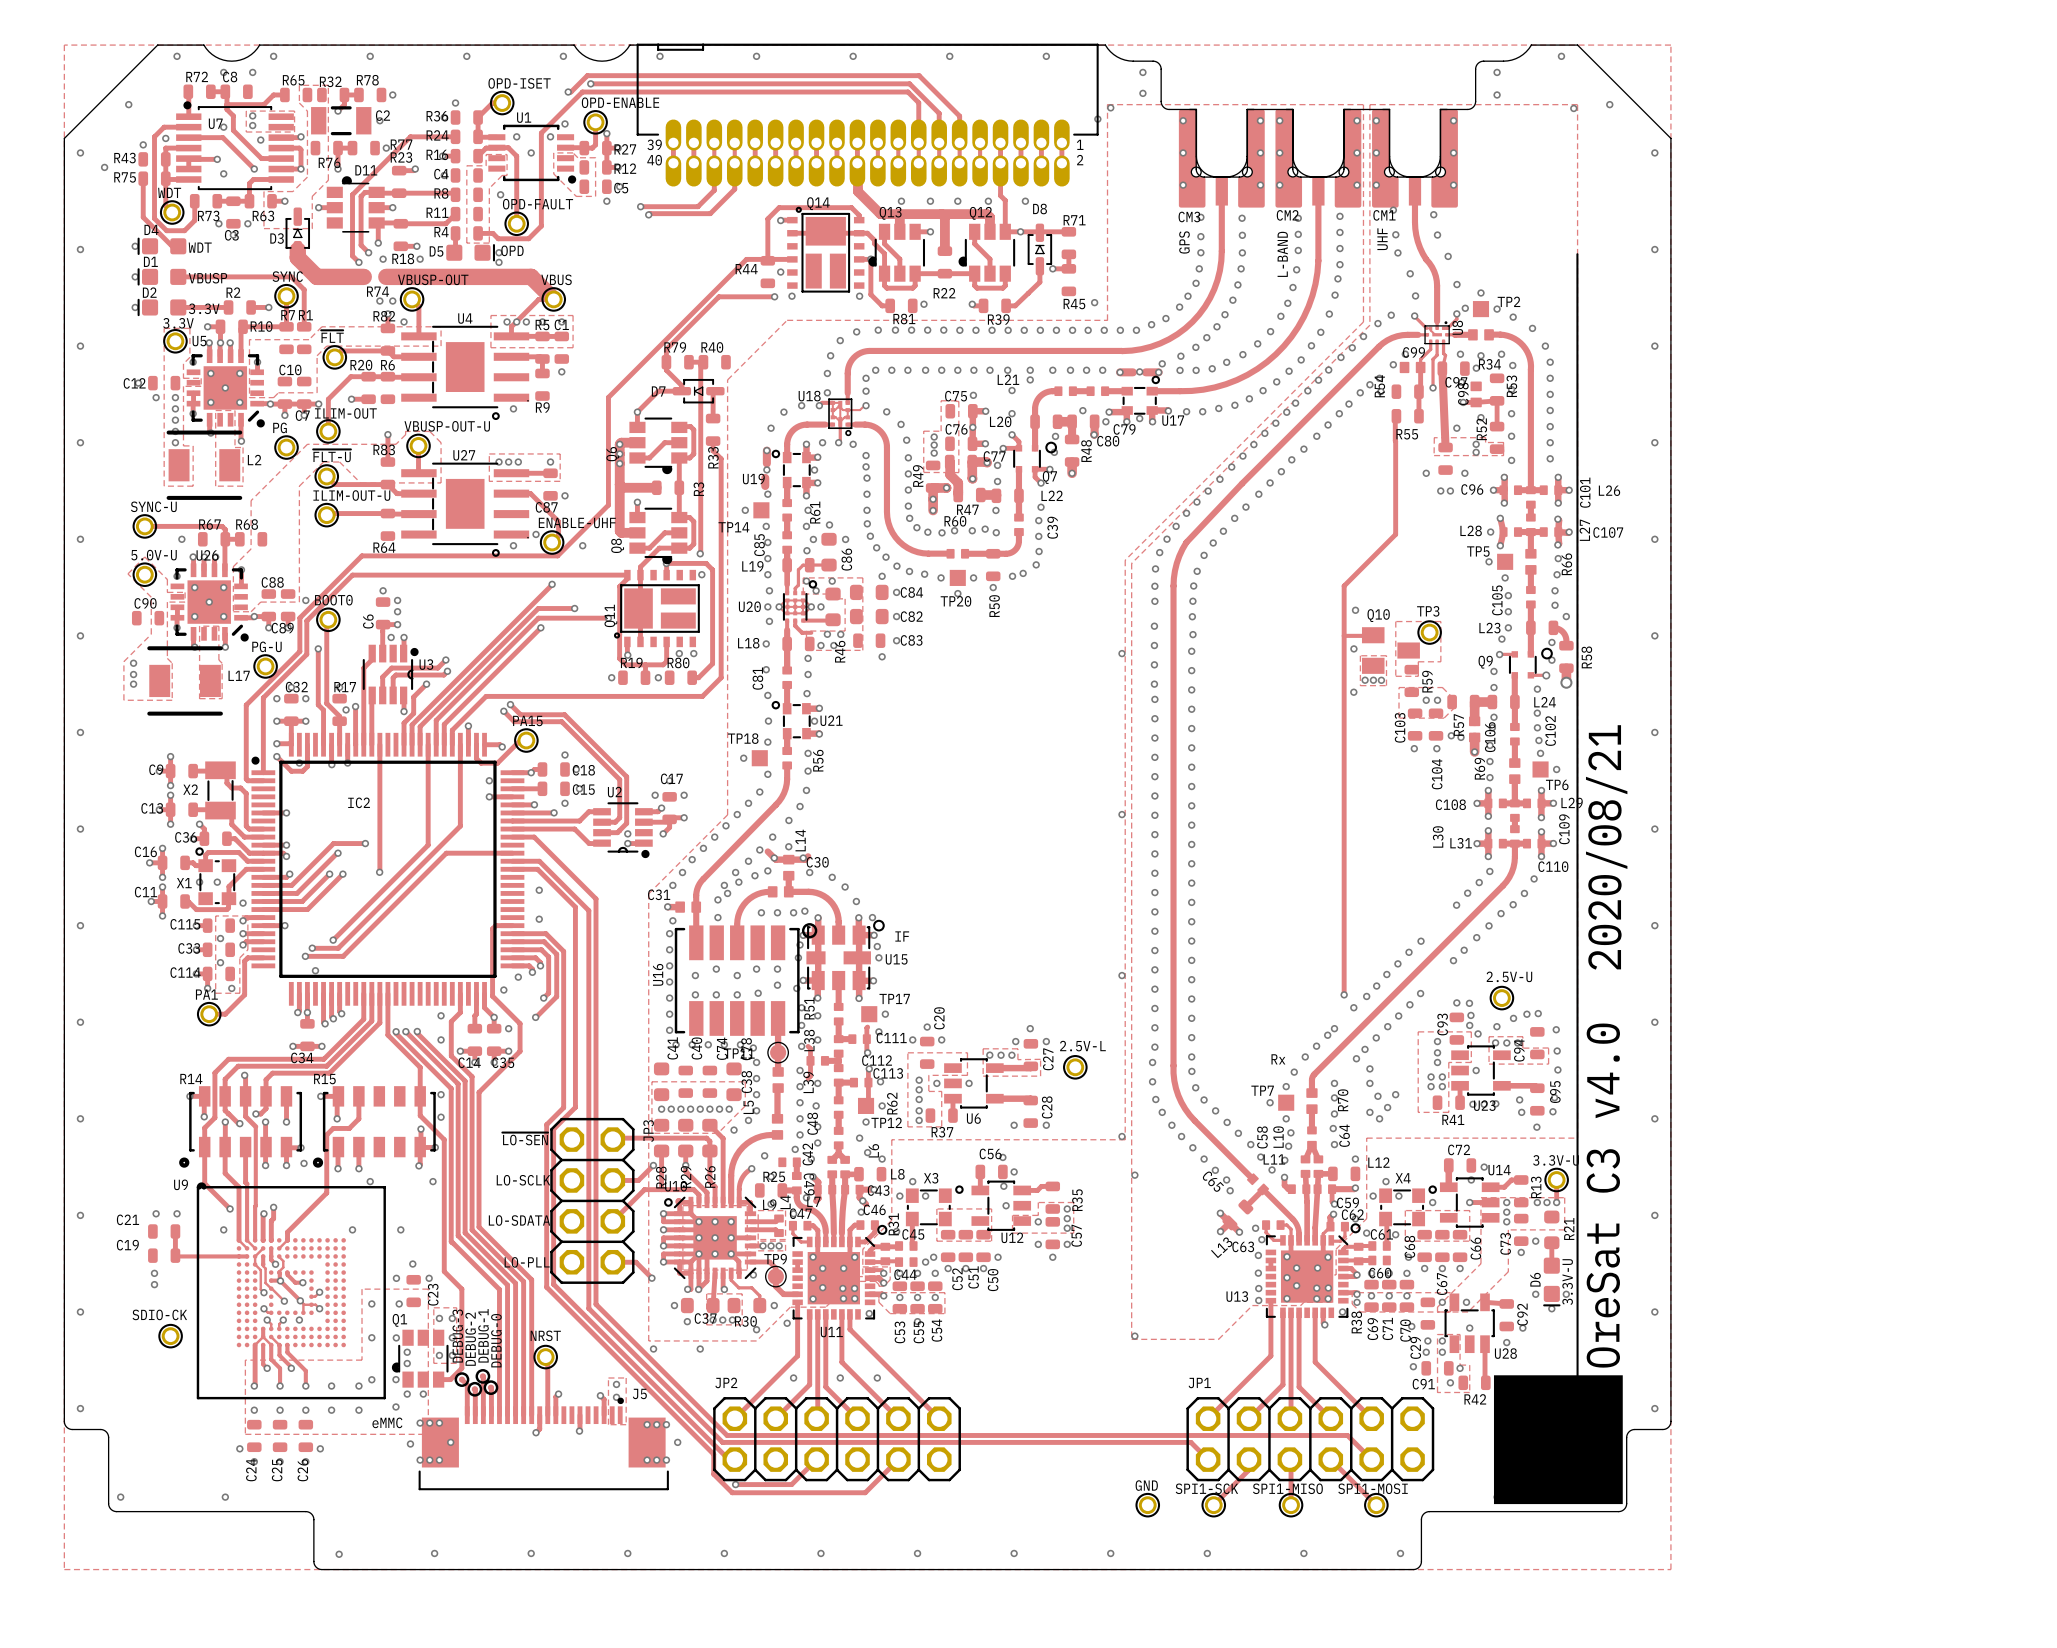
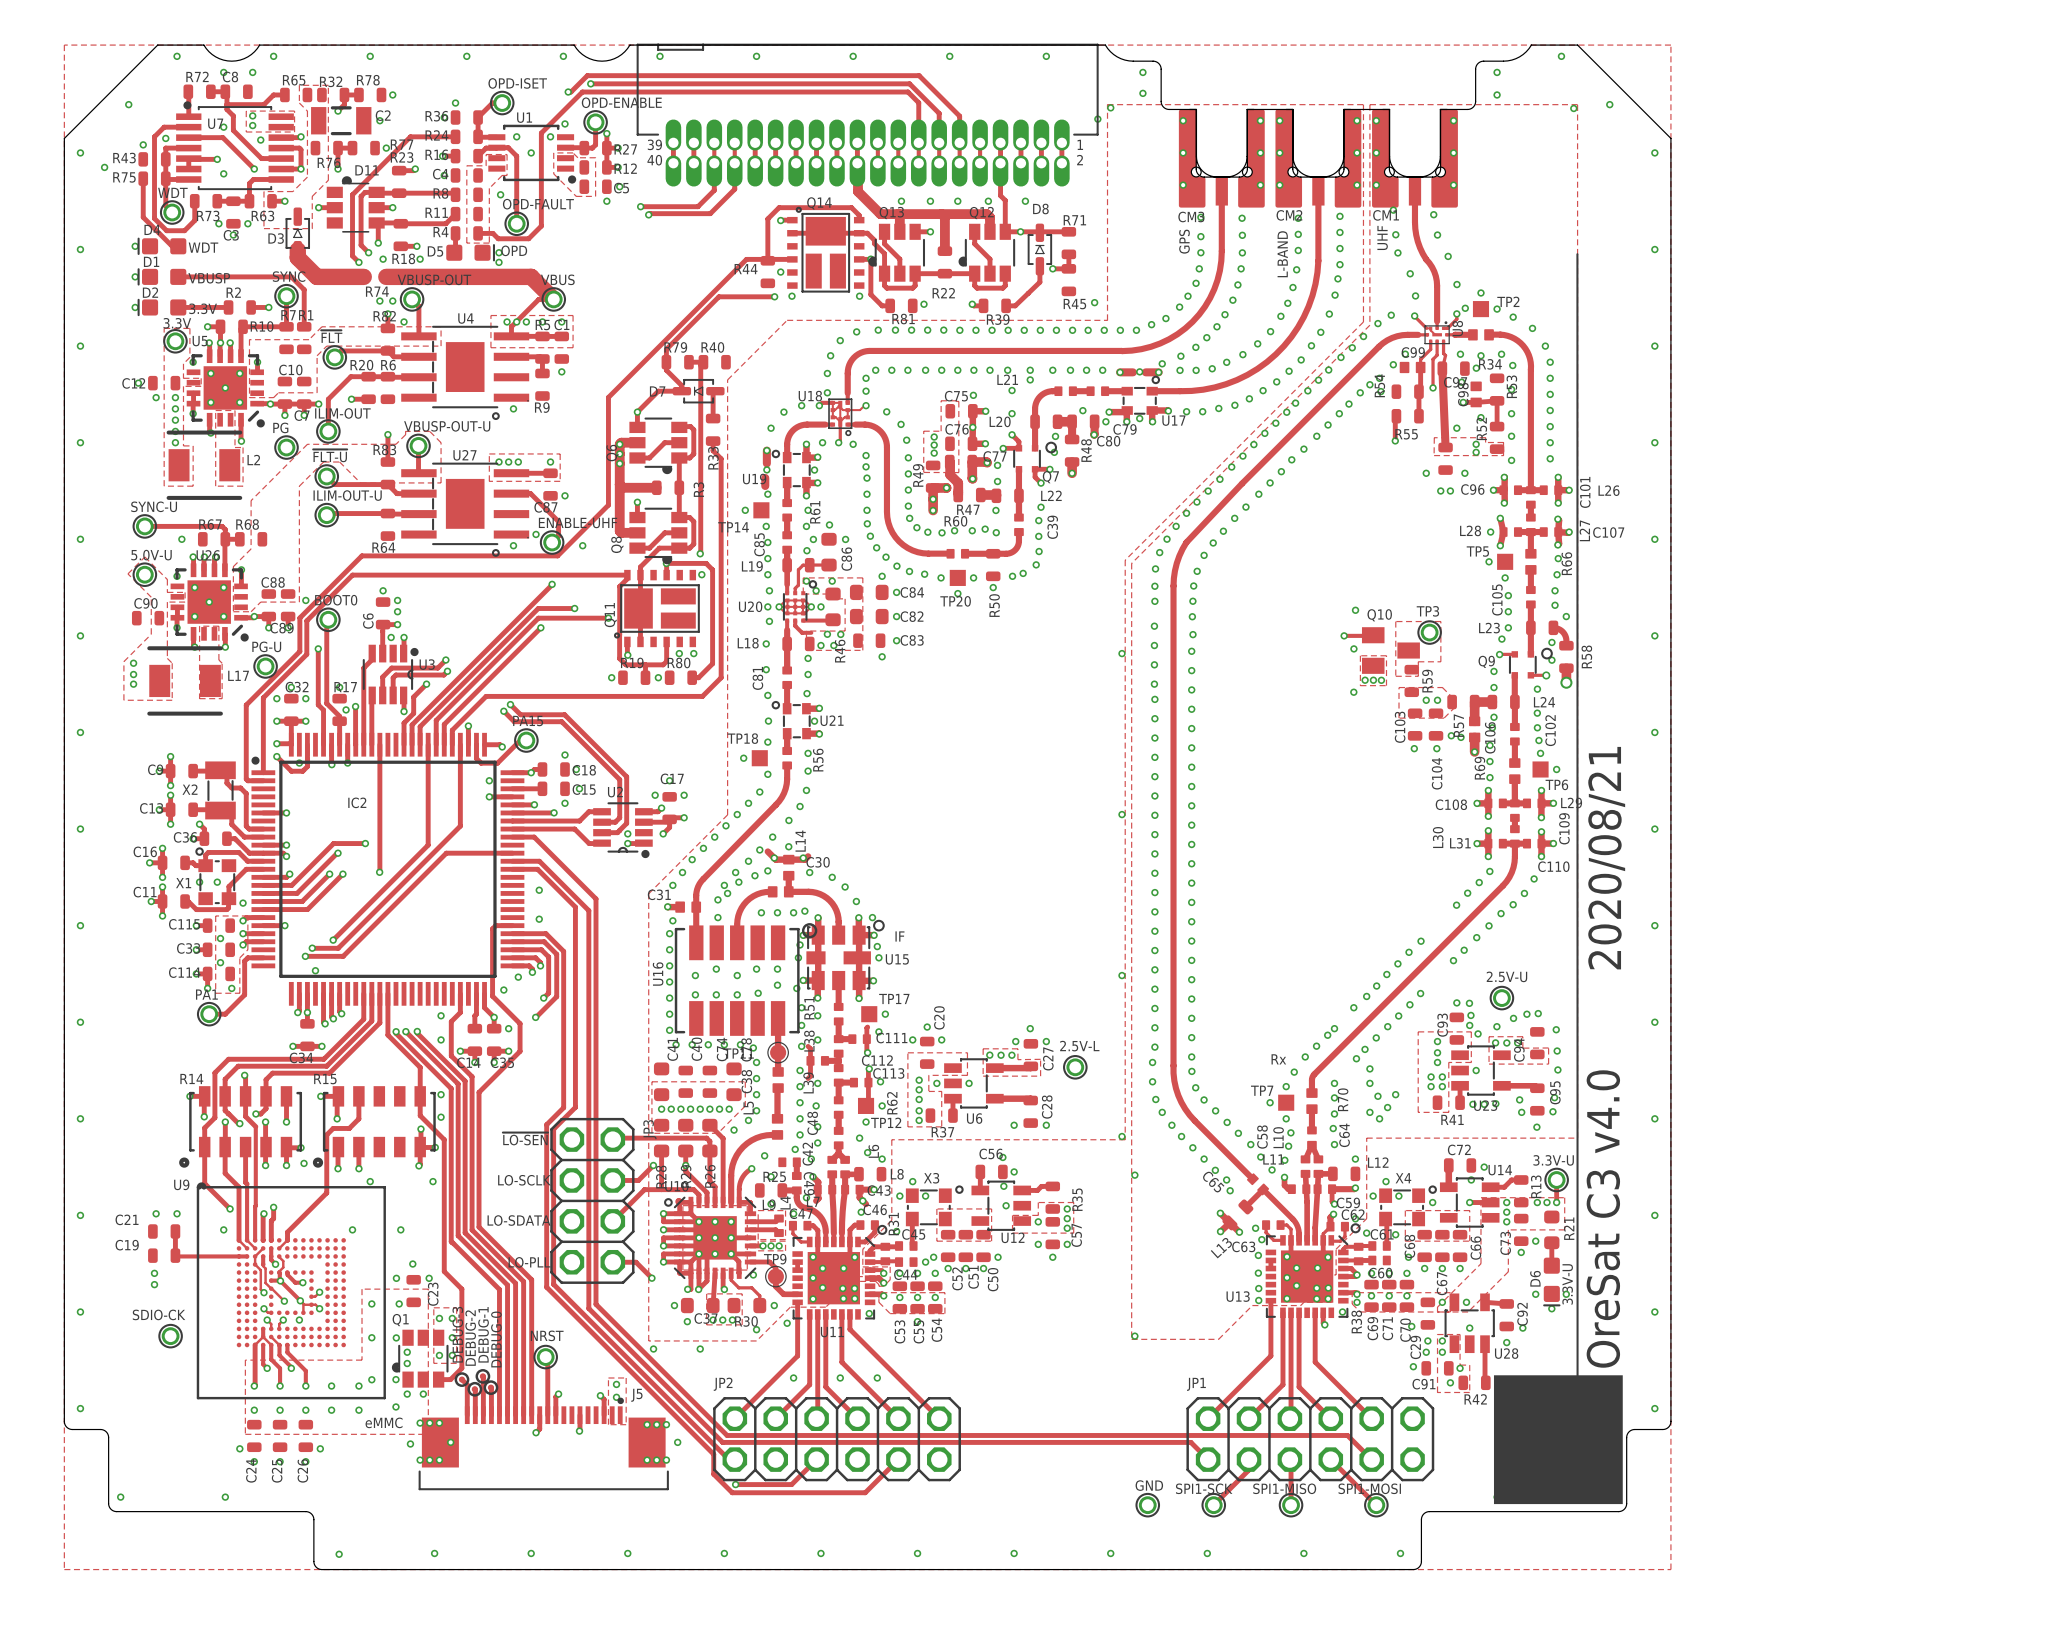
track: (1395, 440) (1395, 534) (1344, 585) (1344, 994) -> none
via: none -> (1395, 440)
via: none -> (1344, 635)
via: (1344, 994) -> none

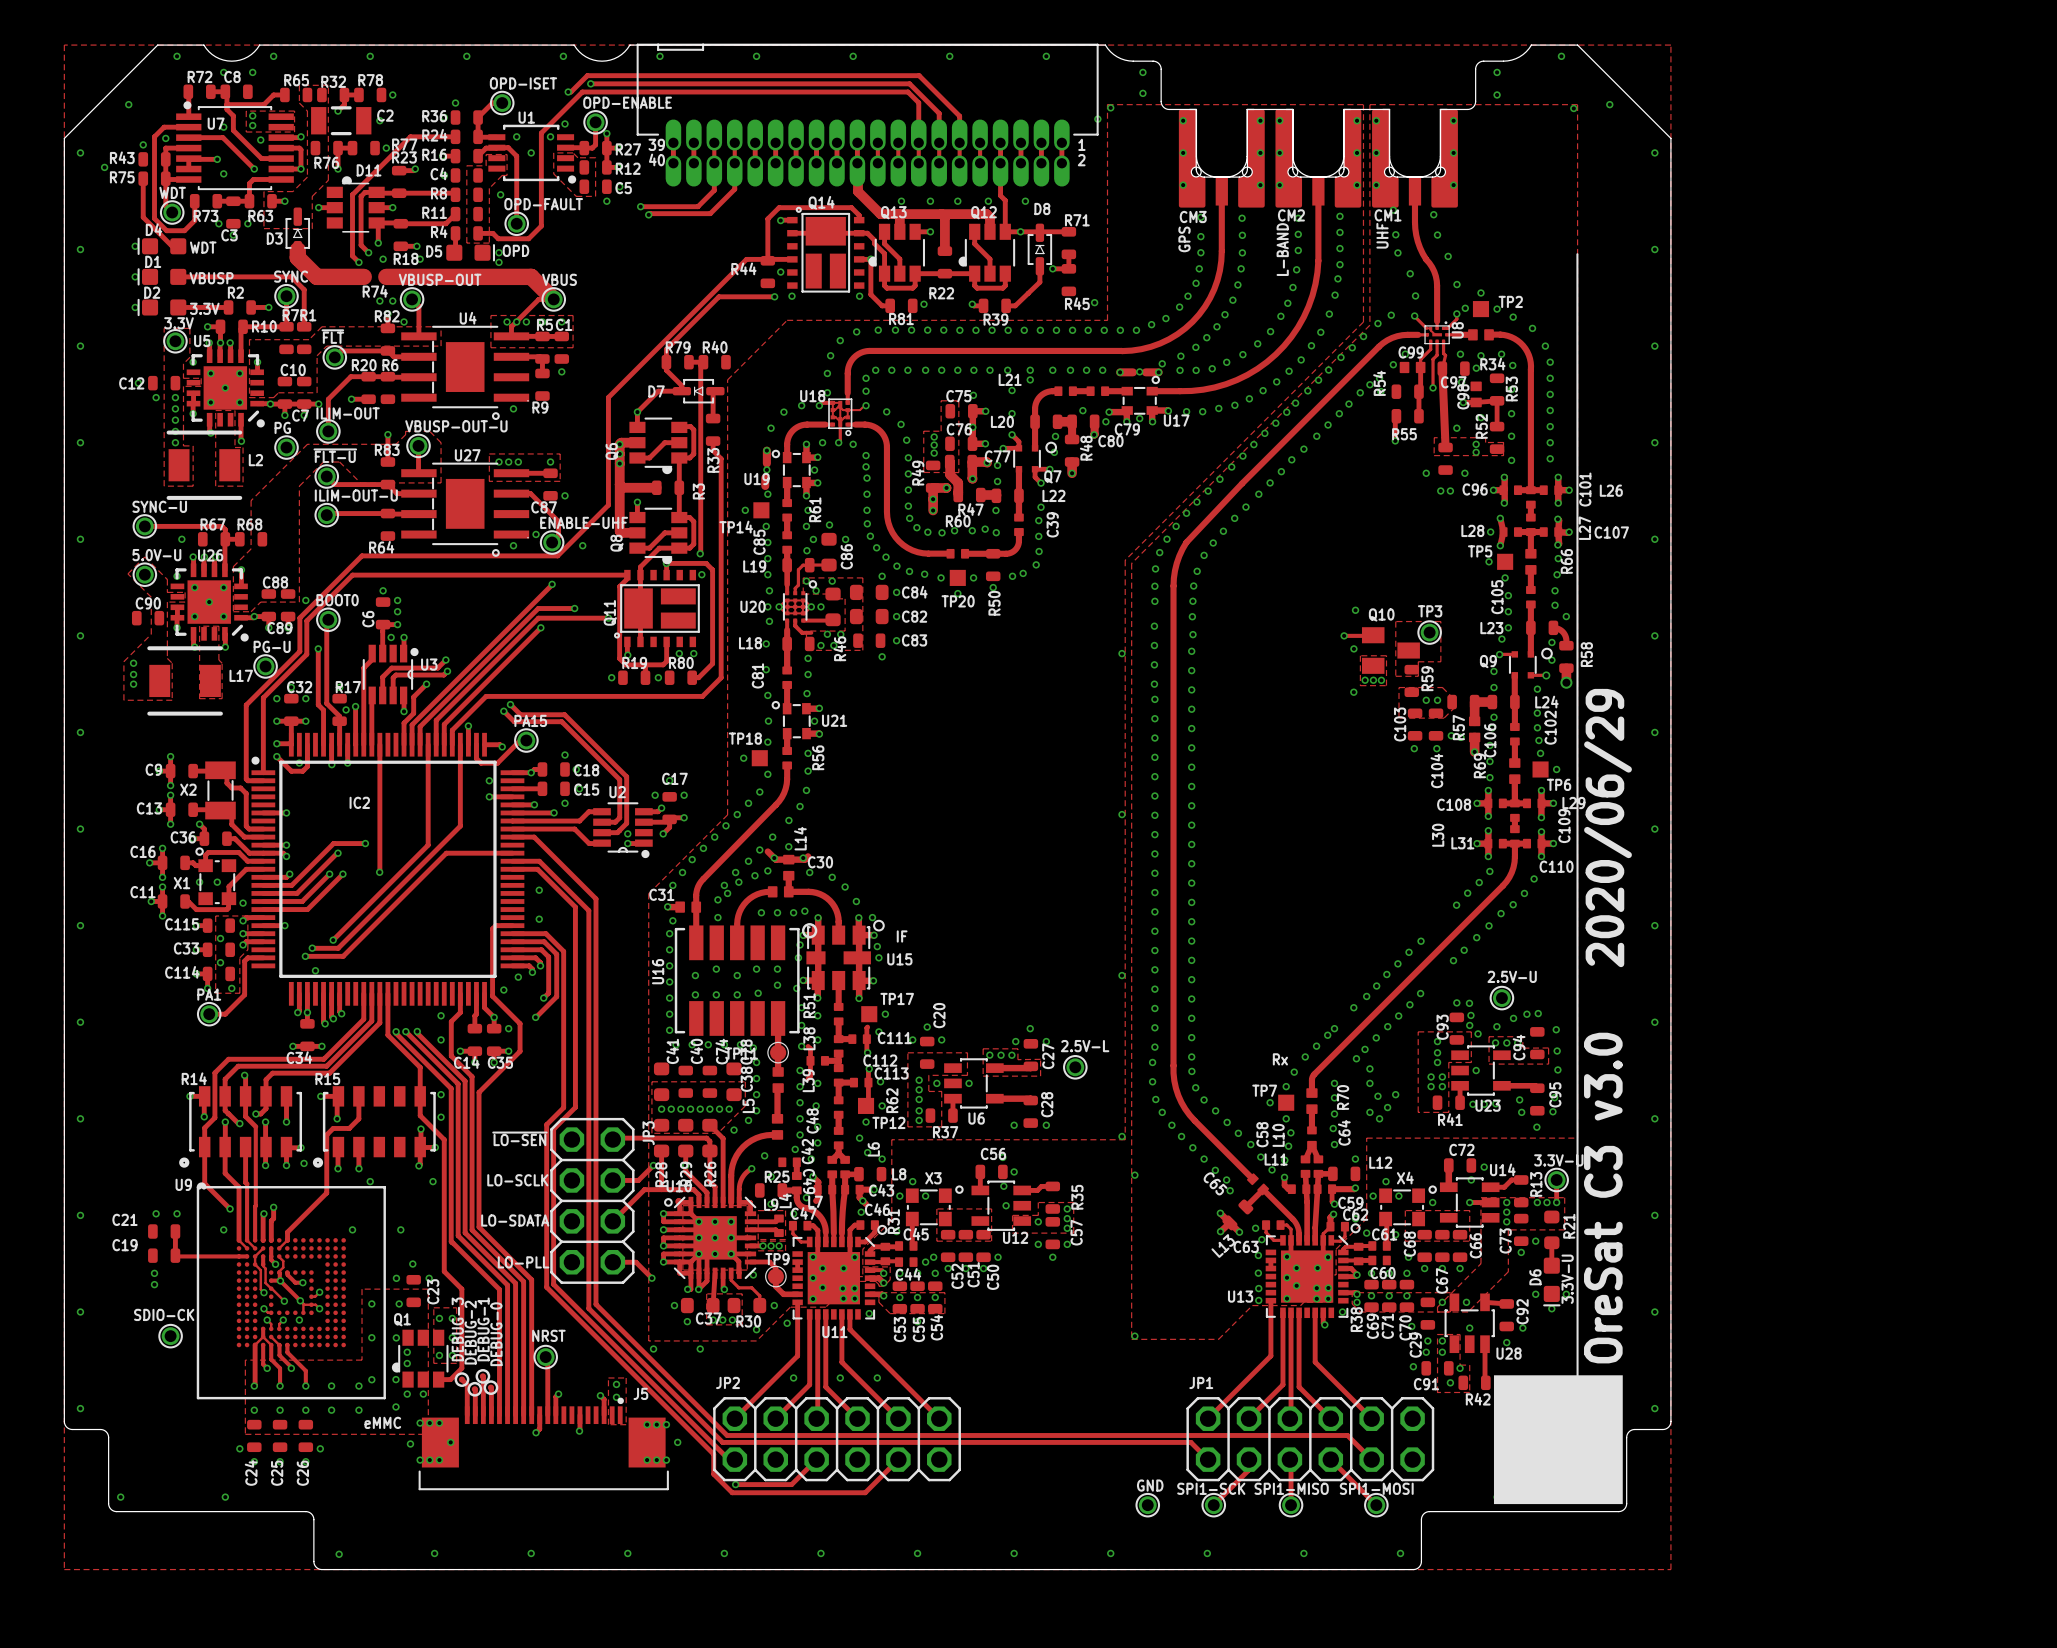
text: 2020/08/21 (1606, 858) -> 2020/06/29 (1608, 828)
text: OreSat C3 v4.0 (1603, 1219) -> OreSat C3 v3.0 (1603, 1198)

